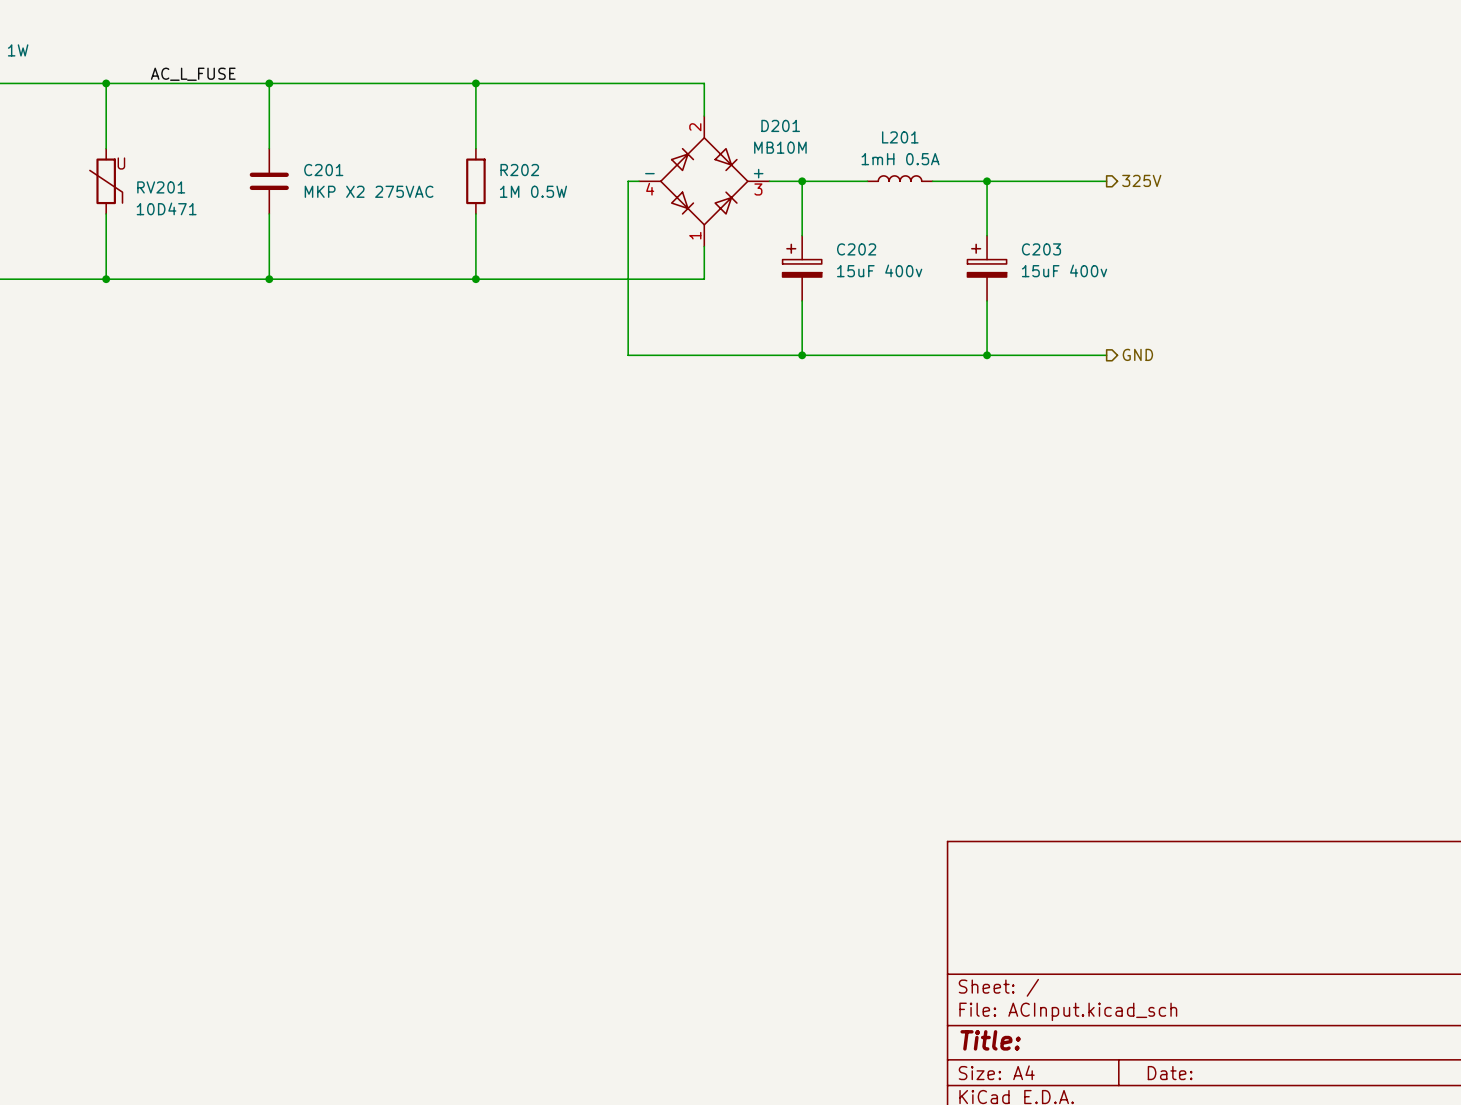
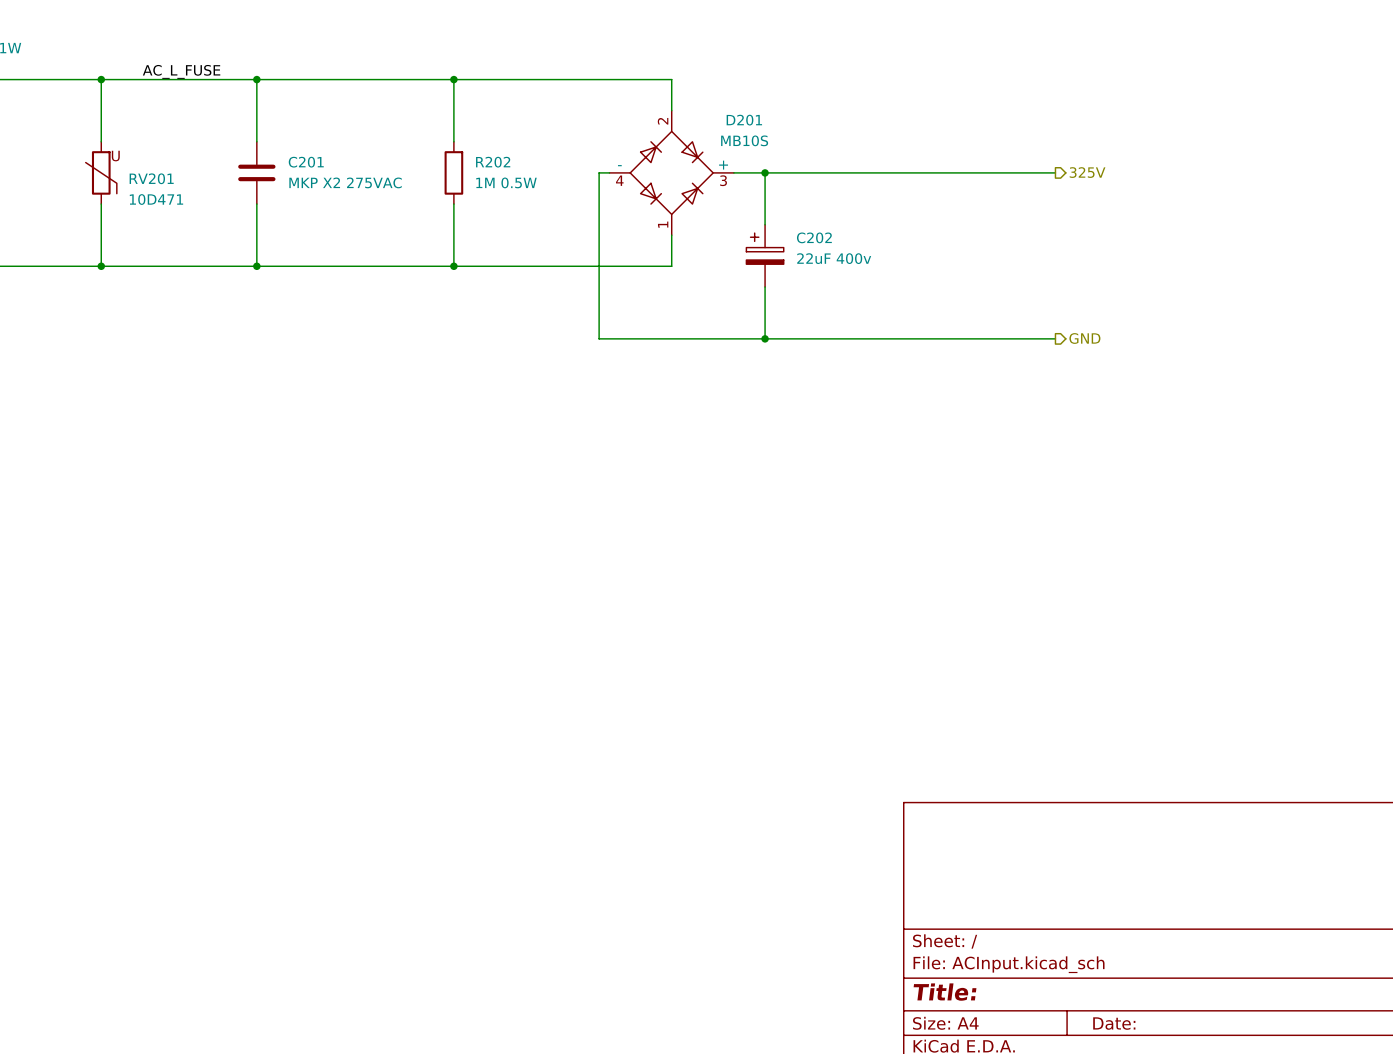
D201 value: MB10M (780, 147) -> MB10S (744, 140)
L201: 1mH 0.5A (900, 178) -> none
wire: none -> (827, 172) (889, 172)
wire: (987, 181) (987, 235) -> none
junction: (987, 181) -> none
C203: 15uF 400v (987, 268) -> none
C202 value: 15uF 400v (879, 270) -> 22uF 400v (834, 258)
wire: (987, 300) (987, 355) -> none
junction: (987, 355) -> none

